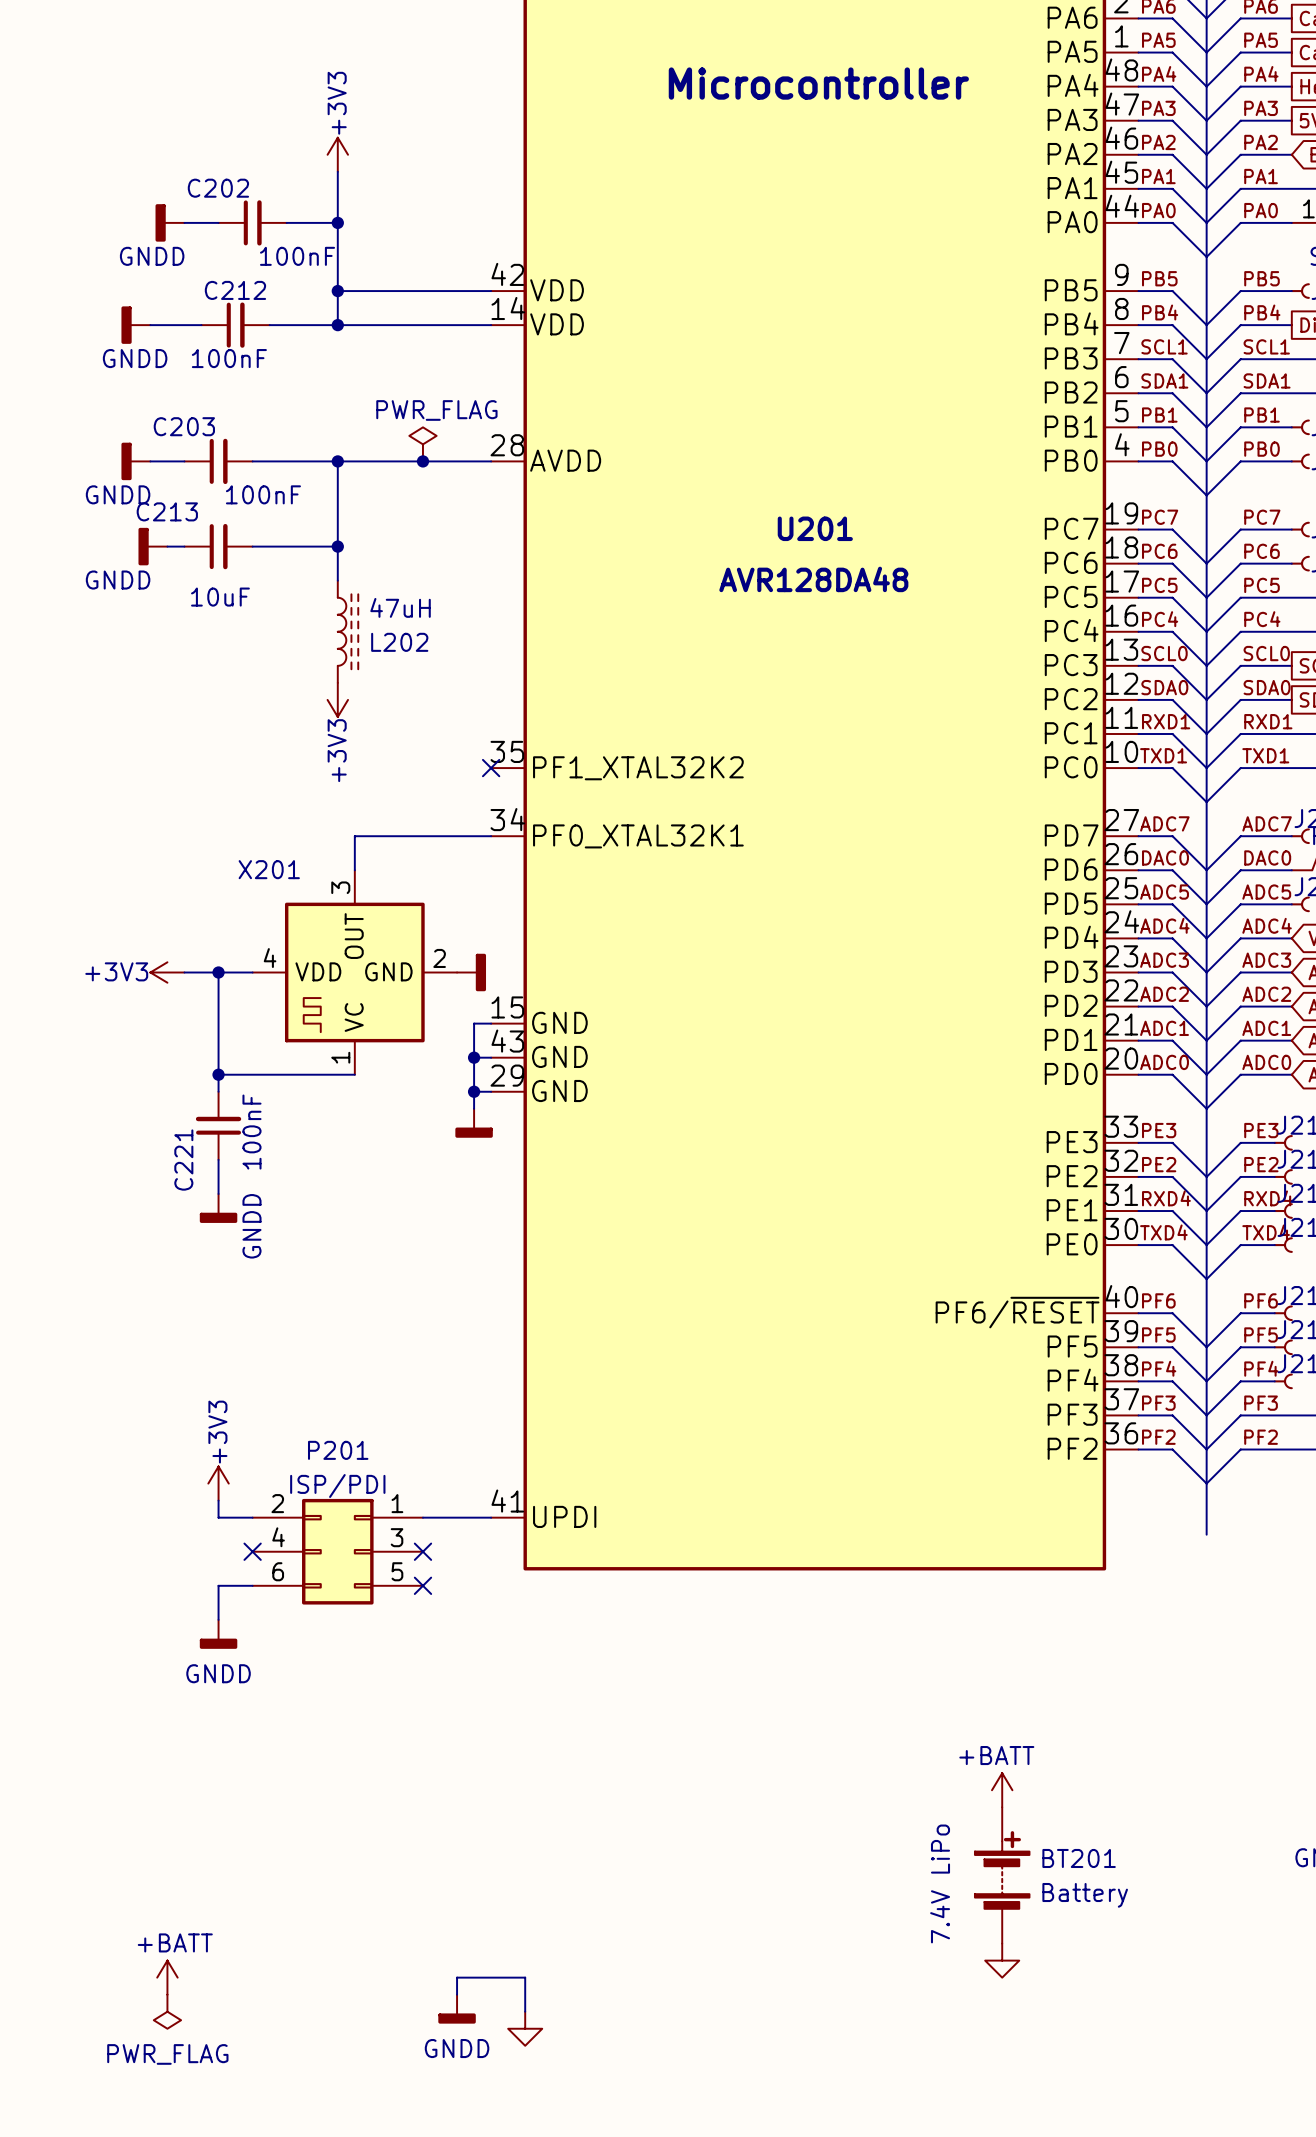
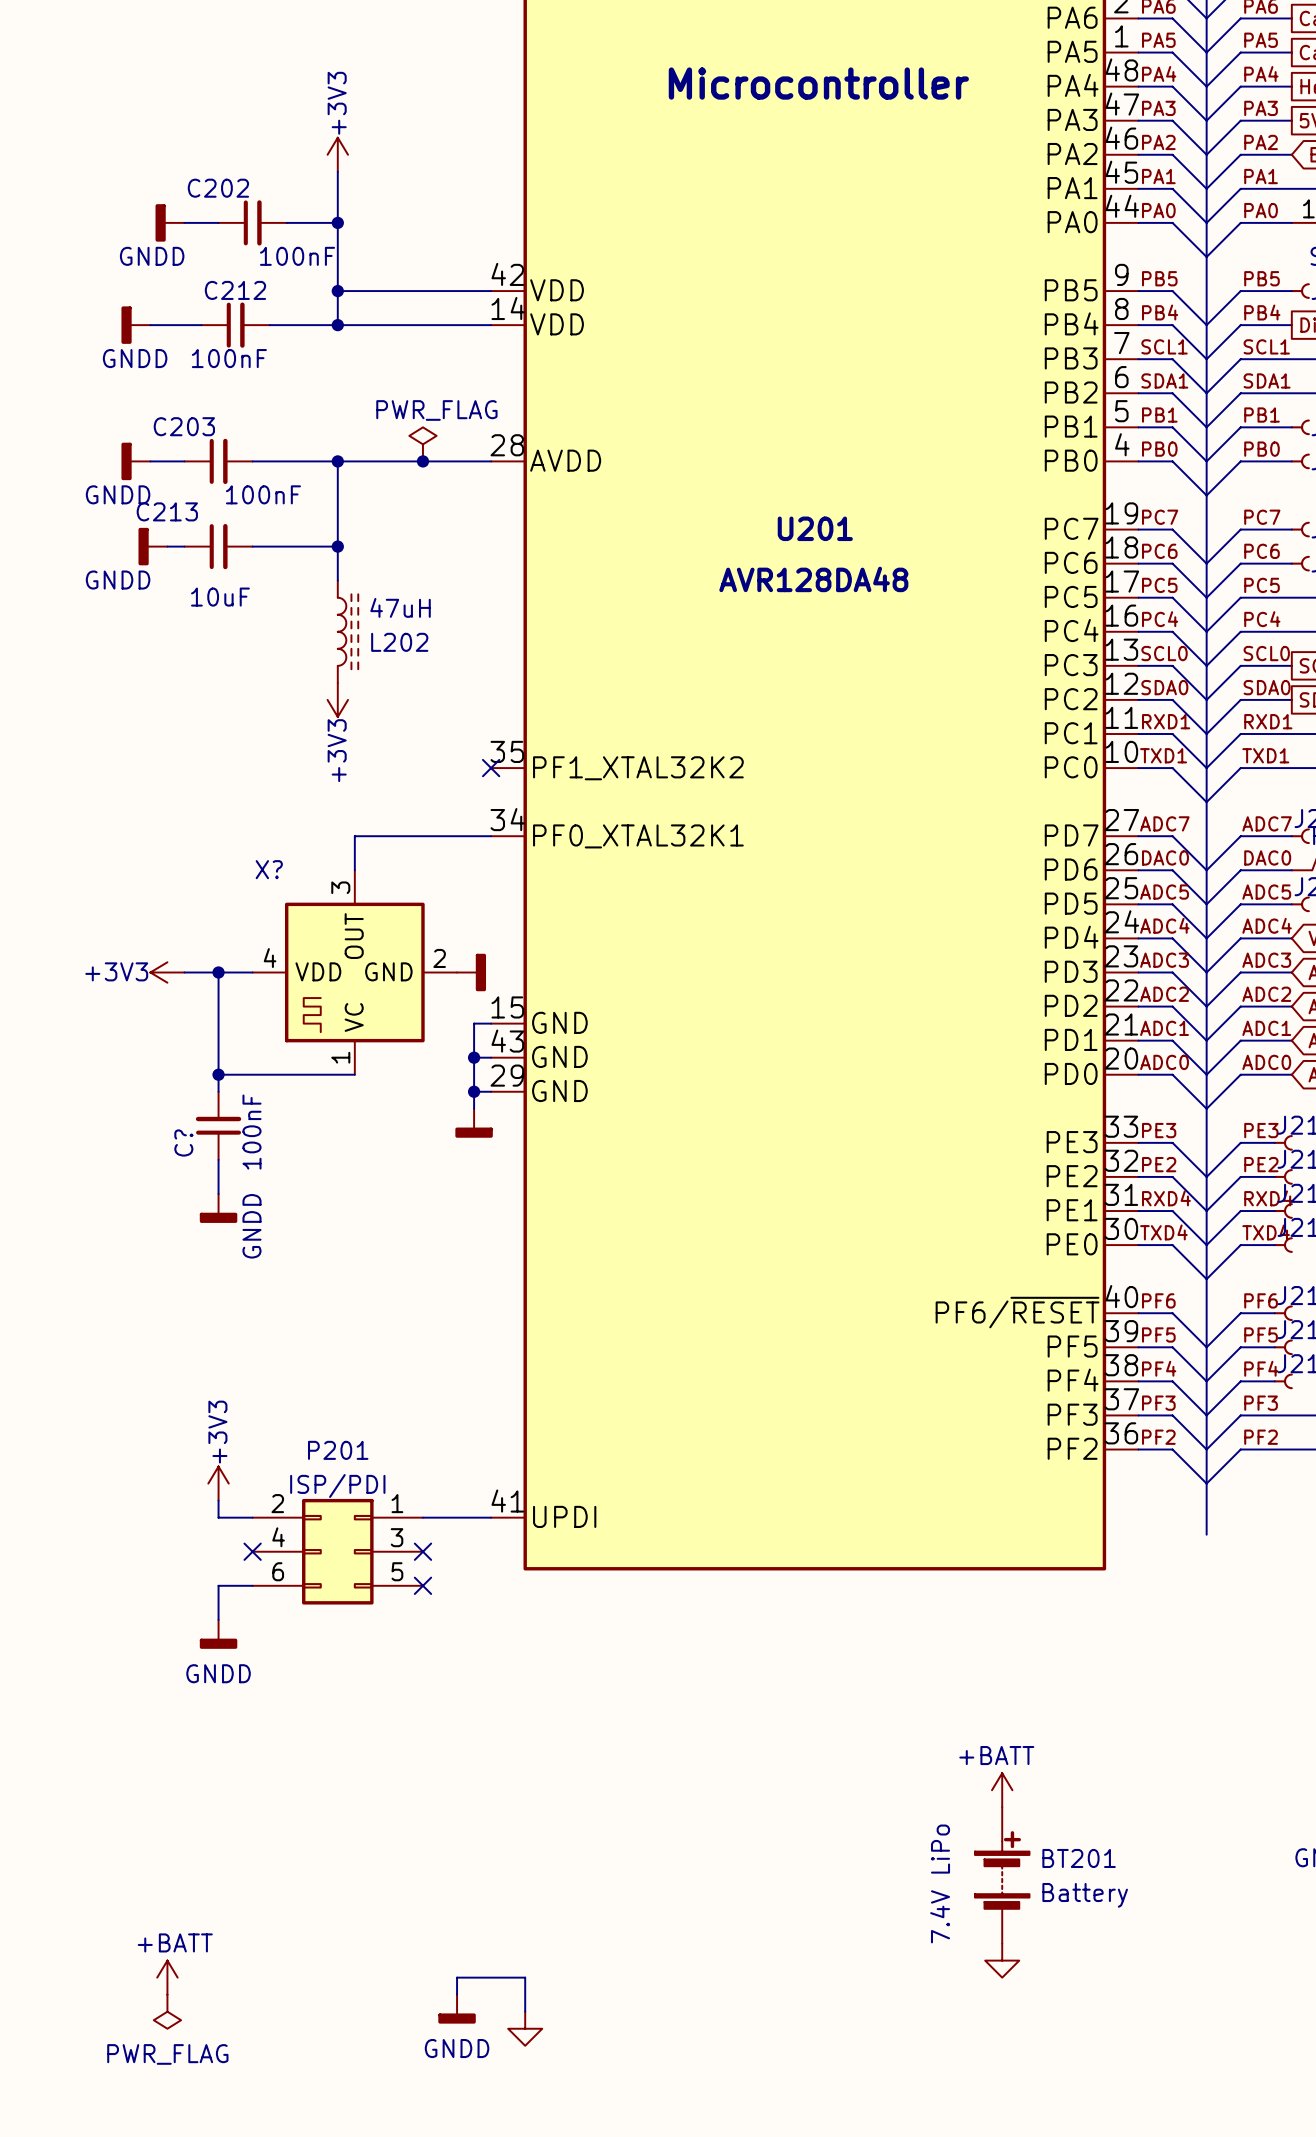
X201 name: X201 (269, 869) -> X? (269, 869)
C221 name: C221 (183, 1160) -> C? (183, 1142)

